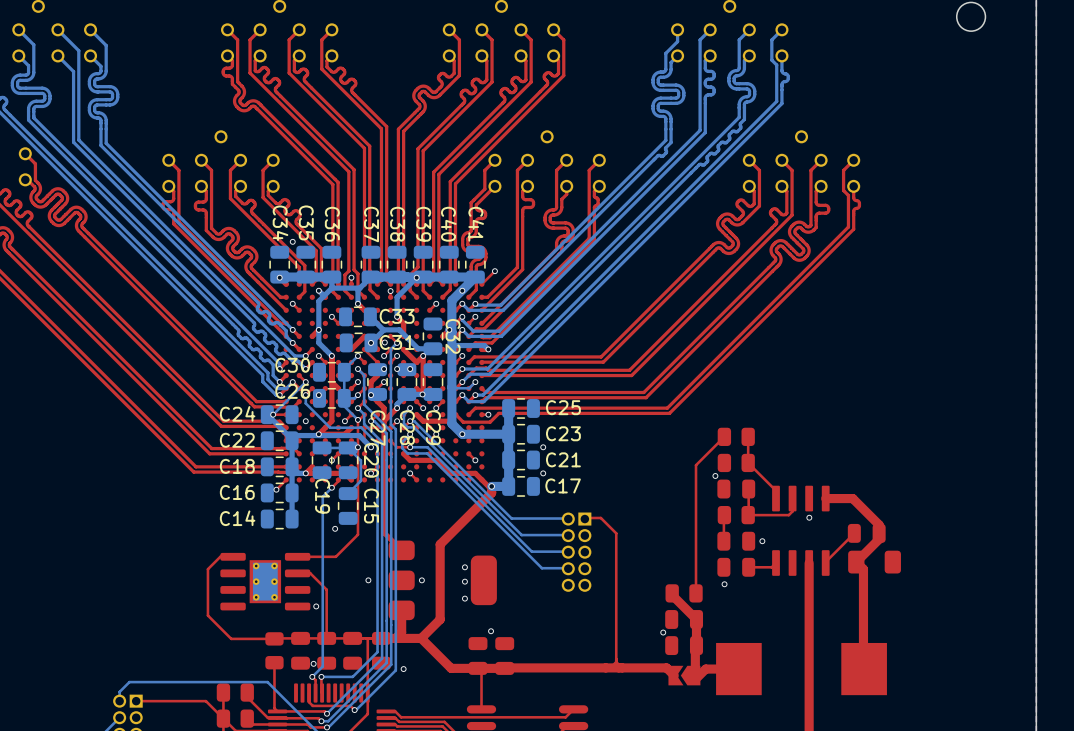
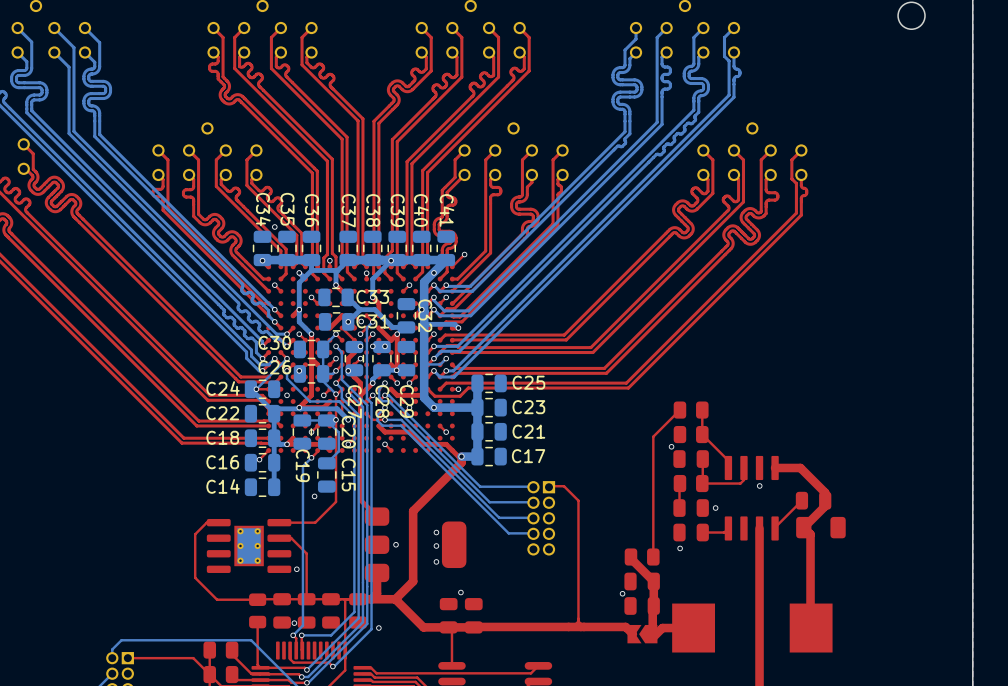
via: (543, 447) -> none
via: (543, 473) -> none
via: (368, 580) -> none

